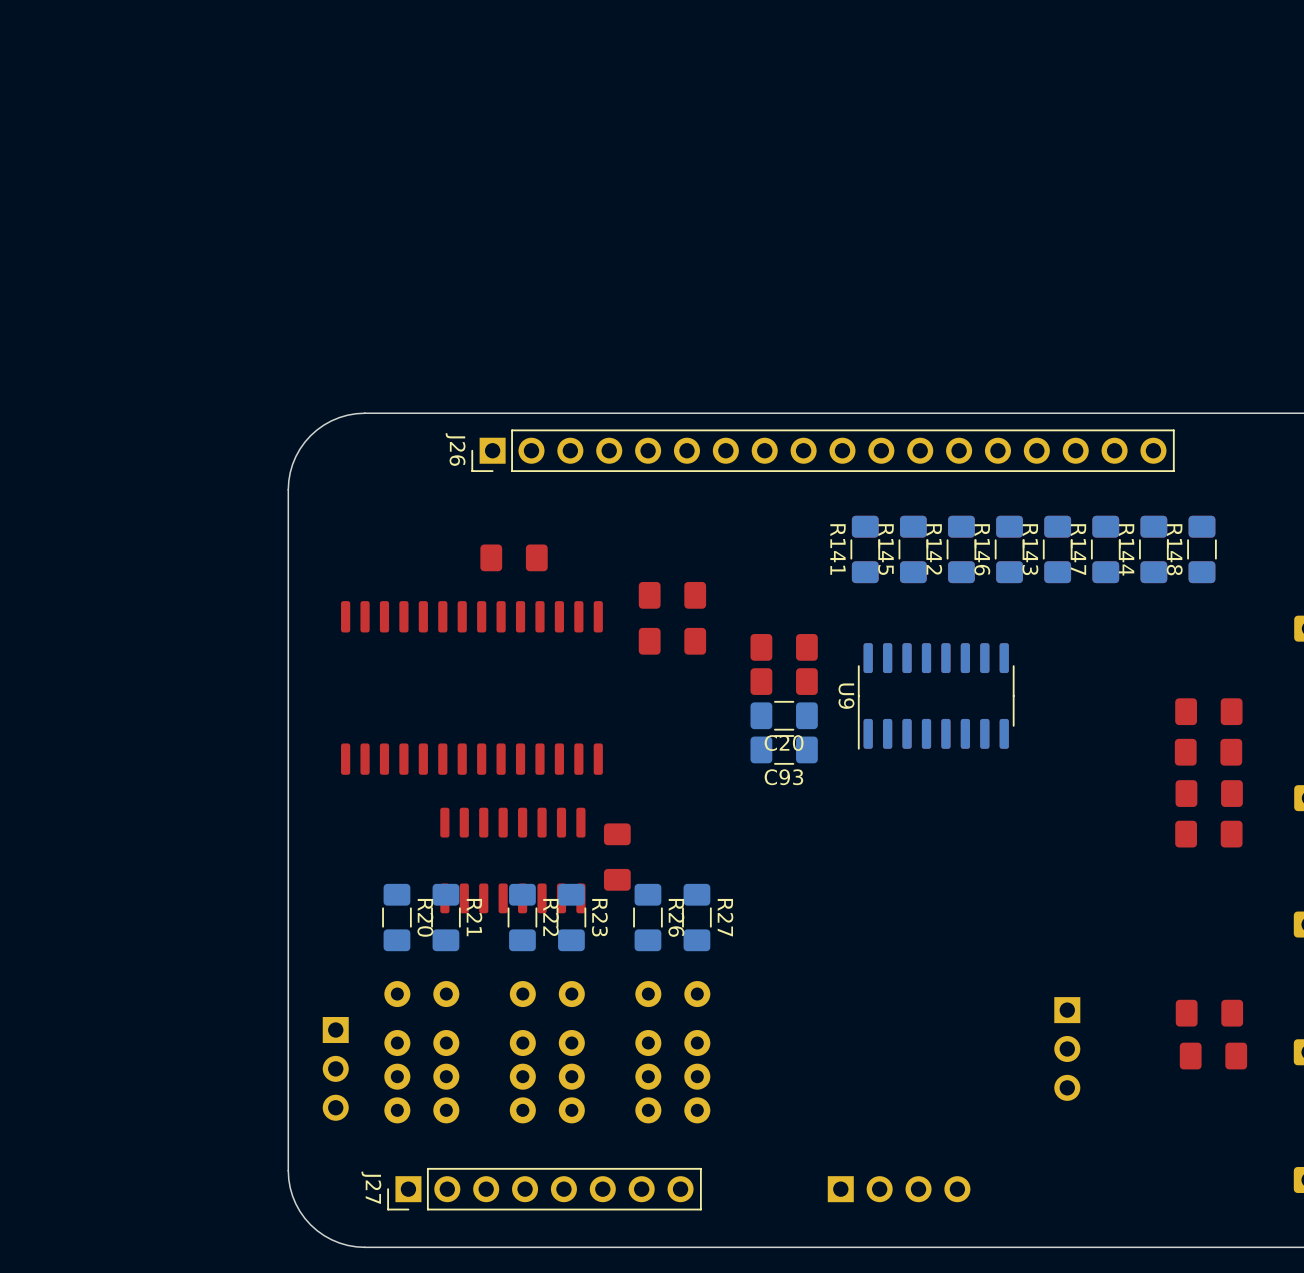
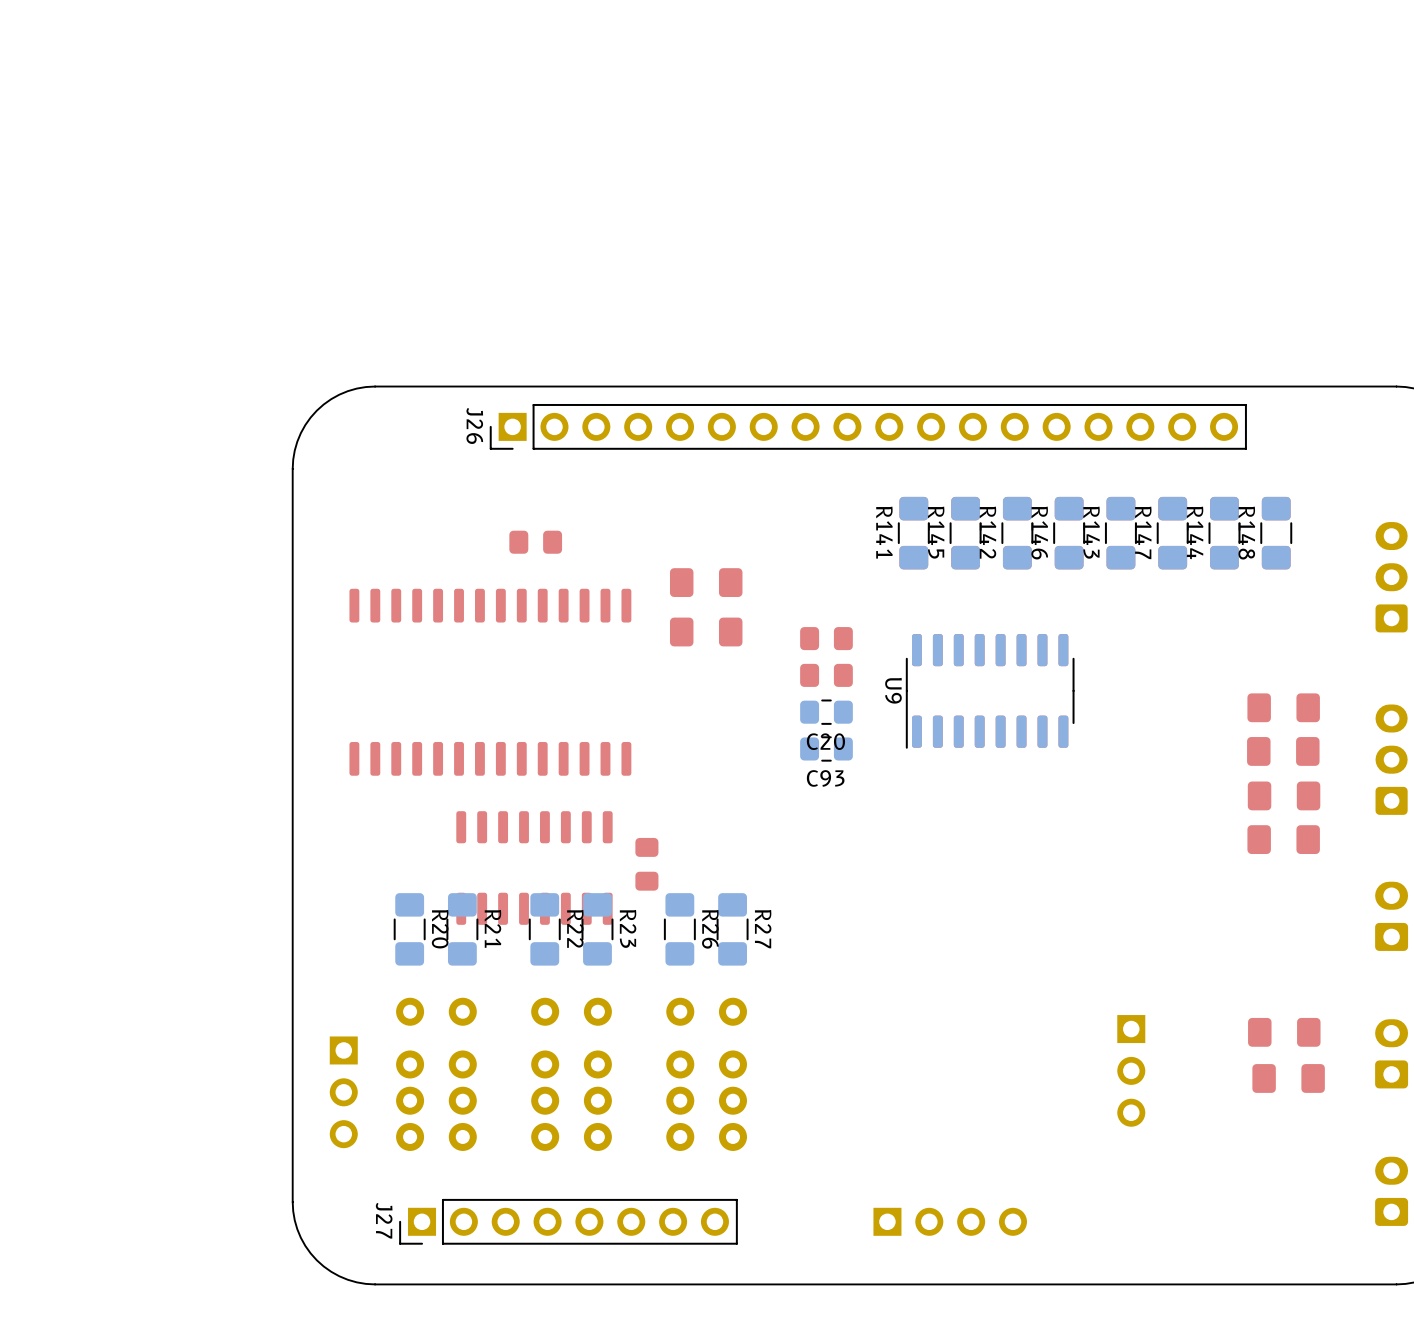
part footprint: [480, 544, 548, 572] -> [509, 530, 563, 554]
part footprint: [750, 634, 818, 661] -> [800, 627, 853, 651]
part footprint: [750, 668, 818, 695] -> [800, 663, 853, 687]
C20 footprint: [750, 700, 818, 731] -> [800, 699, 853, 725]
C93 footprint: [750, 735, 818, 765] -> [800, 736, 853, 762]
part footprint: [603, 823, 631, 891] -> [635, 837, 659, 891]

